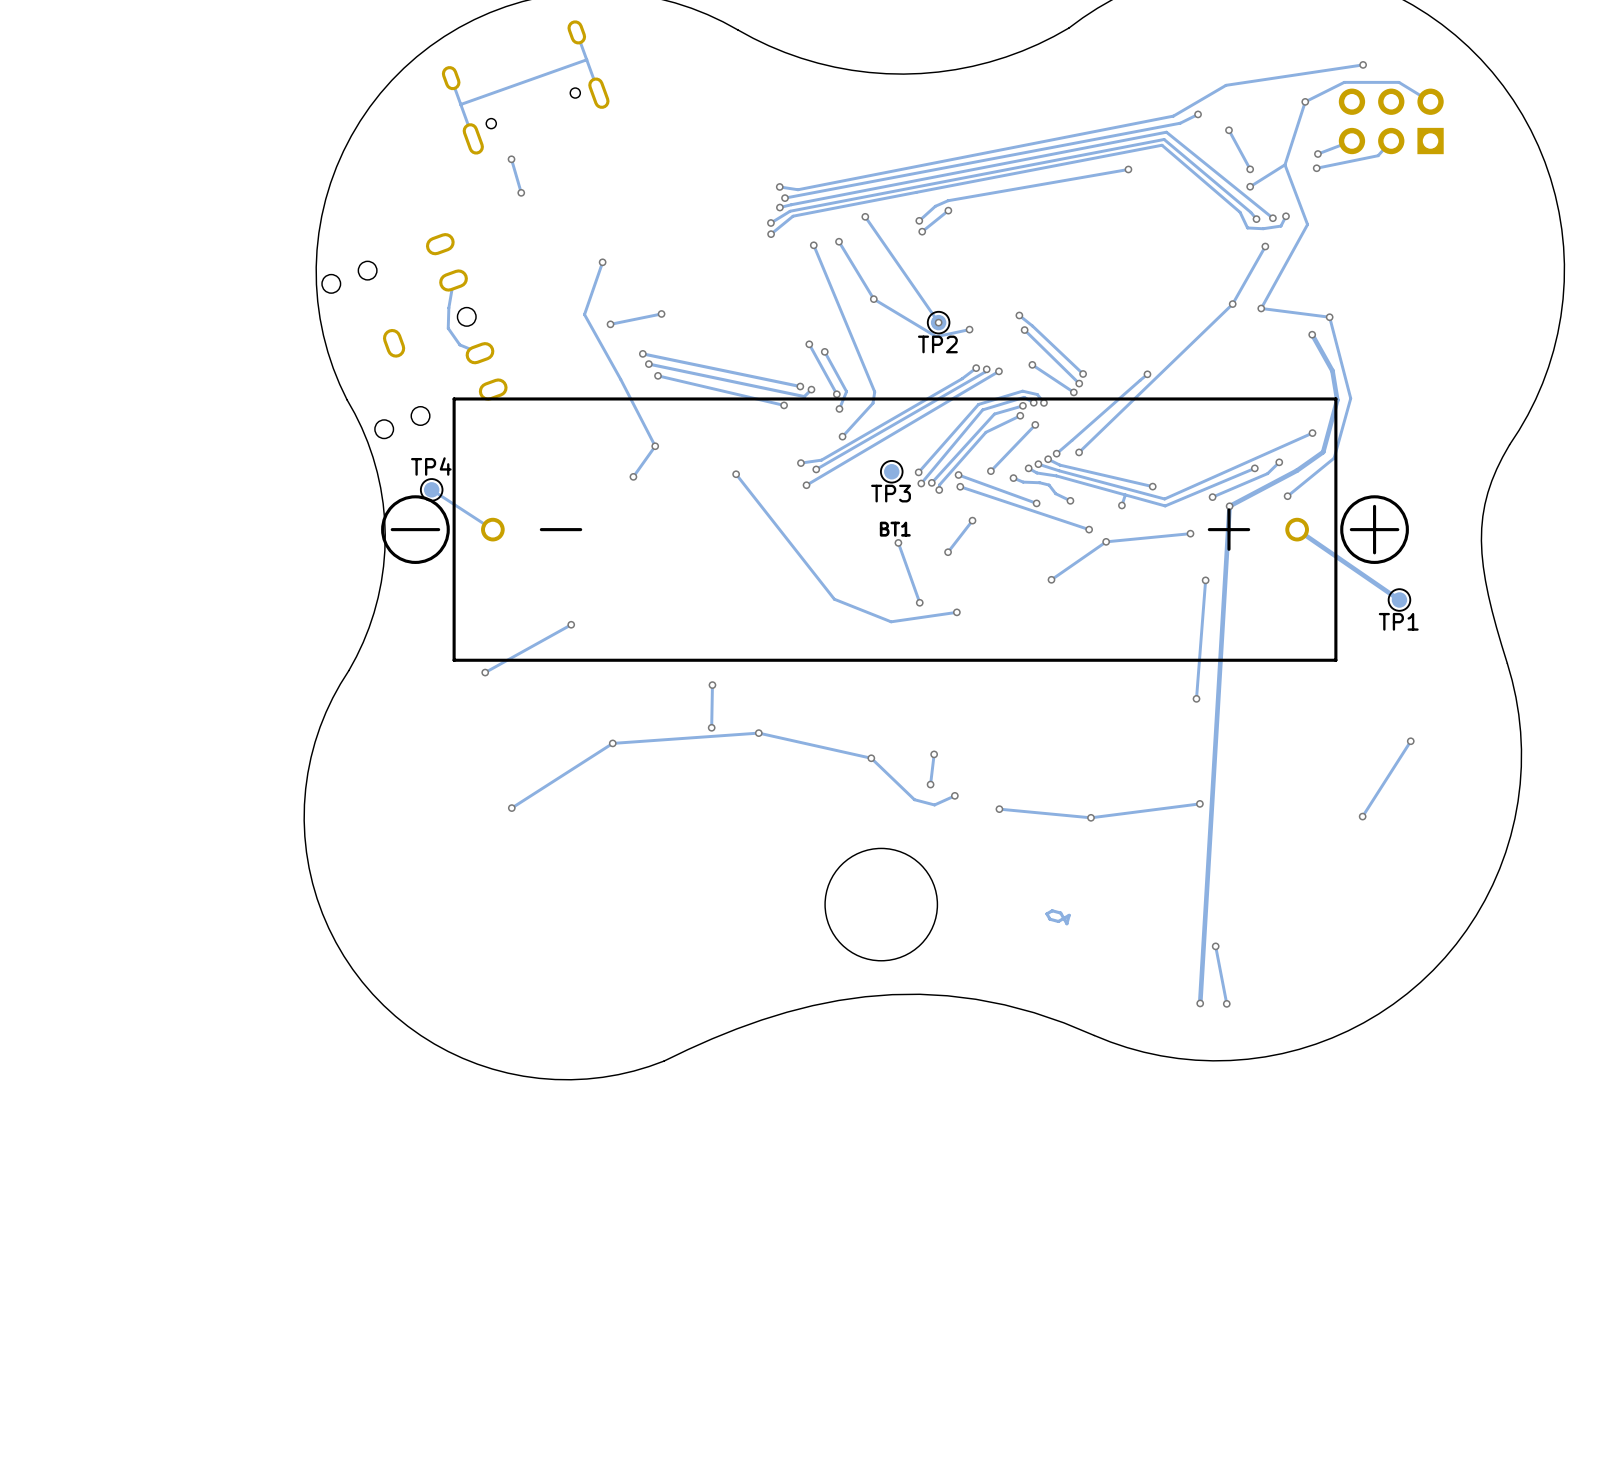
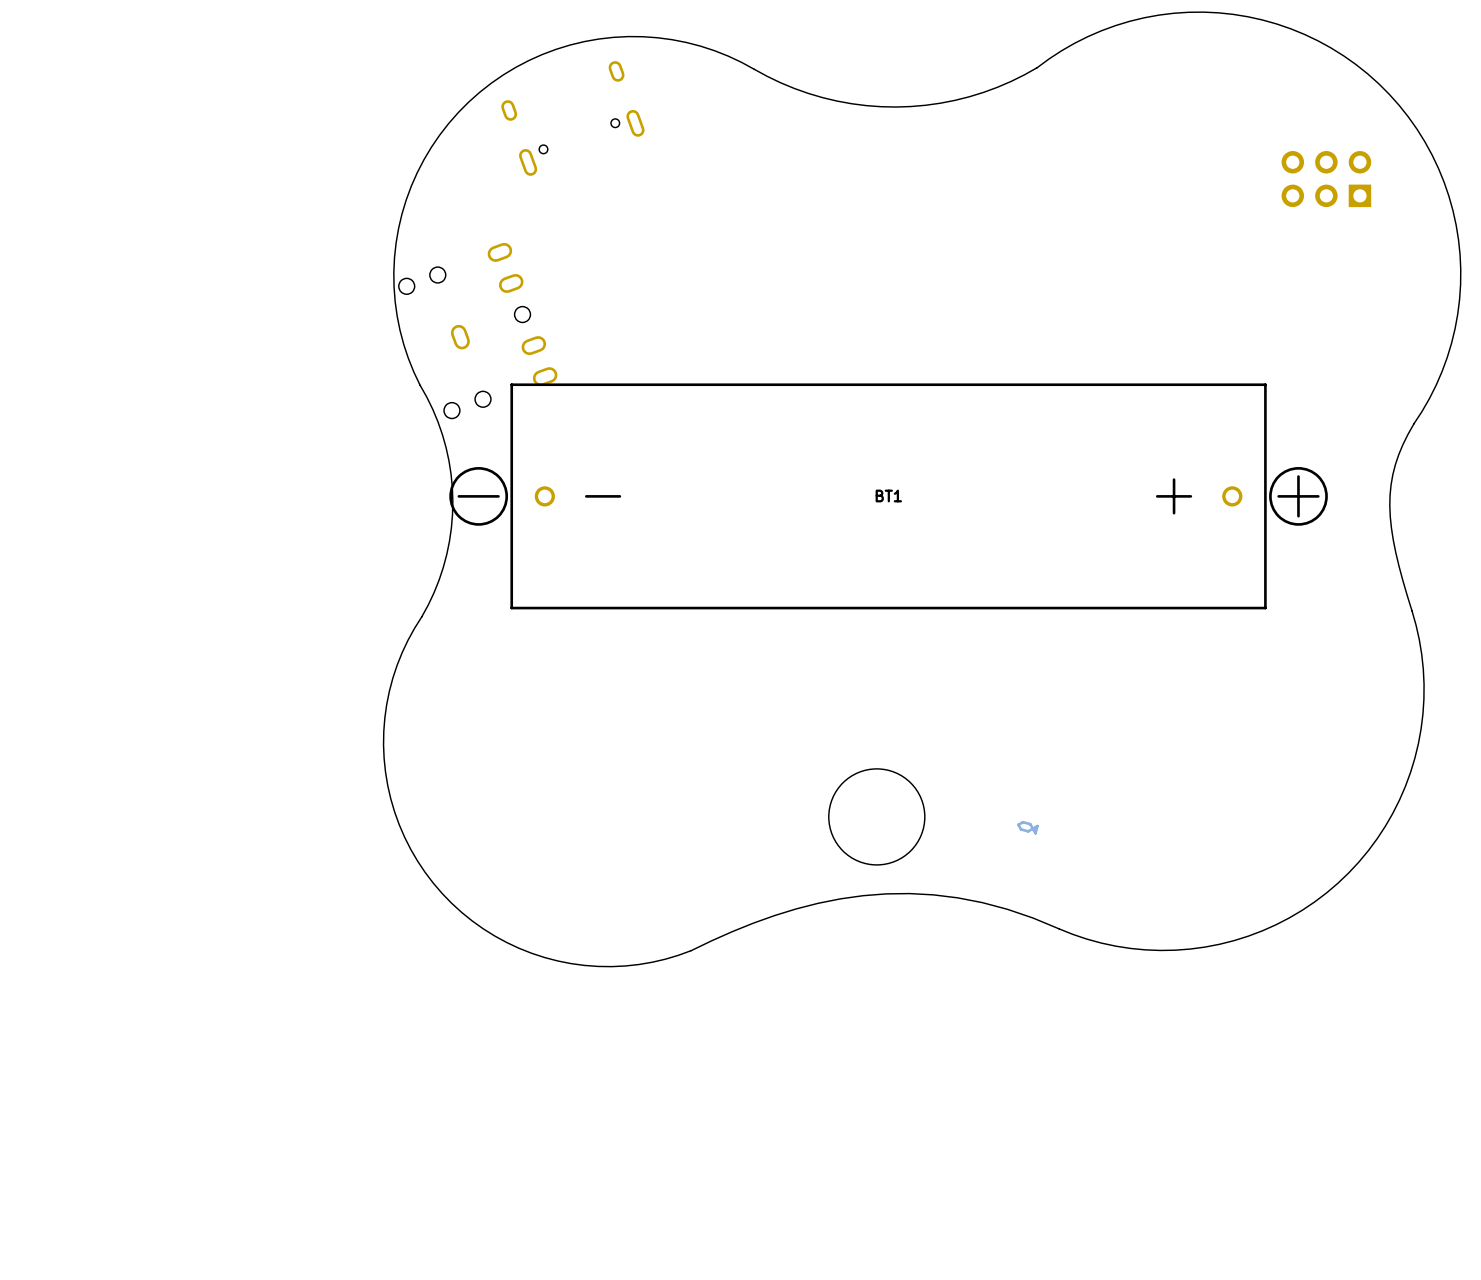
track: (576, 32) (598, 93) -> none
track: (586, 59) (460, 104) -> none
track: (1363, 64) (1226, 85) (1173, 116) (798, 189) (779, 186) -> none
via: (1363, 64) -> none
track: (451, 78) (473, 138) -> none
via: (1305, 101) -> none
track: (1430, 101) (1399, 82) (1344, 82) (1305, 101) (1284, 164) -> none
track: (1198, 114) (1180, 123) (785, 198) -> none
via: (1198, 114) -> none
part position: (1391, 121) -> (1326, 179)
track: (1228, 130) (1250, 169) -> none
via: (1228, 130) -> none
track: (1351, 141) (1317, 154) -> none
track: (1391, 141) (1378, 155) (1316, 168) -> none
via: (1317, 154) -> none
track: (511, 159) (521, 192) -> none
via: (511, 159) -> none
track: (1284, 164) (1307, 224) (1261, 308) (1329, 317) (1350, 398) (1334, 458) (1287, 496) -> none
track: (1284, 164) (1250, 186) -> none
via: (1316, 168) -> none
track: (1128, 169) (948, 200) (935, 206) (919, 220) -> none
via: (1128, 169) -> none
via: (1250, 169) -> none
via: (779, 186) -> none
via: (1250, 186) -> none
via: (521, 192) -> none
via: (785, 198) -> none
track: (779, 207) (1166, 132) (1272, 218) -> none
via: (779, 207) -> none
track: (948, 210) (922, 231) -> none
via: (948, 210) -> none
track: (865, 216) (938, 322) -> none
via: (865, 216) -> none
track: (1285, 216) (1280, 226) (1263, 228) (1247, 227) (1240, 212) (1162, 145) (793, 216) (771, 234) -> none
via: (1285, 216) -> none
via: (1272, 218) -> none
track: (1256, 219) (1164, 139) (790, 211) (770, 223) -> none
via: (1256, 219) -> none
via: (919, 220) -> none
via: (770, 223) -> none
via: (922, 231) -> none
via: (771, 234) -> none
track: (839, 241) (873, 299) (936, 336) (969, 329) -> none
via: (839, 241) -> none
track: (813, 245) (874, 391) (873, 403) (842, 436) -> none
via: (813, 245) -> none
track: (1265, 246) (1232, 304) (1079, 452) -> none
via: (1265, 246) -> none
track: (602, 262) (584, 314) (655, 446) (633, 476) -> none
via: (602, 262) -> none
track: (453, 280) (448, 307) (448, 328) (459, 344) (479, 353) -> none
via: (873, 299) -> none
via: (1232, 304) -> none
via: (1261, 308) -> none
track: (661, 313) (610, 324) -> none
via: (661, 313) -> none
track: (1019, 315) (1083, 373) -> none
via: (1019, 315) -> none
via: (1329, 317) -> none
TP2: (938, 322) -> none
via: (938, 322) -> none
via: (610, 324) -> none
via: (969, 329) -> none
track: (1024, 330) (1079, 383) -> none
via: (1024, 330) -> none
track: (1312, 334) (1332, 370) (1337, 400) (1323, 452) (1296, 470) (1229, 506) (1200, 1003) -> none
via: (1312, 334) -> none
track: (809, 344) (836, 394) -> none
via: (809, 344) -> none
track: (824, 351) (846, 391) (839, 408) -> none
via: (824, 351) -> none
track: (642, 353) (800, 386) -> none
via: (642, 353) -> none
track: (648, 364) (804, 396) (811, 389) -> none
via: (648, 364) -> none
track: (1032, 364) (1073, 392) -> none
via: (1032, 364) -> none
track: (976, 368) (962, 378) (821, 460) (800, 463) -> none
via: (976, 368) -> none
track: (986, 369) (816, 469) -> none
via: (986, 369) -> none
track: (998, 371) (806, 485) -> none
via: (998, 371) -> none
via: (1083, 373) -> none
track: (1147, 374) (1056, 453) -> none
via: (1147, 374) -> none
track: (658, 375) (784, 405) -> none
via: (658, 375) -> none
via: (1079, 383) -> none
via: (800, 386) -> none
via: (811, 389) -> none
via: (1073, 392) -> none
via: (836, 394) -> none
track: (1033, 402) (1024, 397) (982, 409) (921, 483) -> none
via: (1033, 402) -> none
track: (1043, 402) (1037, 394) (1022, 391) (978, 404) (918, 472) -> none
via: (1043, 402) -> none
via: (784, 405) -> none
track: (1022, 405) (994, 414) (931, 482) -> none
via: (1022, 405) -> none
via: (839, 408) -> none
track: (1020, 415) (985, 432) (939, 484) (939, 490) -> none
via: (1020, 415) -> none
track: (1035, 424) (990, 471) -> none
via: (1035, 424) -> none
track: (1312, 433) (1164, 498) (1038, 464) -> none
via: (1312, 433) -> none
via: (842, 436) -> none
via: (655, 446) -> none
via: (1079, 452) -> none
via: (1056, 453) -> none
track: (1048, 459) (1059, 465) (1152, 486) -> none
via: (1048, 459) -> none
track: (1279, 462) (1267, 473) (1212, 497) -> none
via: (1279, 462) -> none
via: (800, 463) -> none
via: (1038, 464) -> none
via: (1028, 468) -> none
track: (1254, 468) (1165, 505) (1056, 475) (1037, 472) (1028, 468) -> none
via: (1254, 468) -> none
via: (816, 469) -> none
TP3: (891, 471) -> none
via: (990, 471) -> none
via: (918, 472) -> none
track: (736, 474) (834, 599) (891, 621) (956, 612) -> none
via: (736, 474) -> none
track: (958, 475) (1036, 503) -> none
via: (958, 475) -> none
via: (633, 476) -> none
track: (1013, 478) (1023, 482) (1049, 485) (1055, 493) (1070, 500) -> none
via: (1013, 478) -> none
via: (931, 482) -> none
via: (921, 483) -> none
via: (806, 485) -> none
track: (960, 486) (1089, 529) -> none
via: (960, 486) -> none
via: (1152, 486) -> none
track: (431, 489) (492, 529) -> none
TP4: (431, 489) -> none
via: (939, 490) -> none
track: (1125, 494) (1121, 505) -> none
via: (1287, 496) -> none
via: (1212, 497) -> none
via: (1070, 500) -> none
via: (1036, 503) -> none
via: (1121, 505) -> none
via: (1229, 506) -> none
track: (972, 520) (948, 552) -> none
via: (972, 520) -> none
via: (1089, 529) -> none
track: (1297, 529) (1399, 600) -> none
track: (1190, 533) (1106, 541) (1051, 579) -> none
via: (1190, 533) -> none
via: (1106, 541) -> none
track: (898, 542) (919, 602) -> none
via: (898, 542) -> none
via: (948, 552) -> none
via: (1051, 579) -> none
track: (1205, 580) (1196, 698) -> none
via: (1205, 580) -> none
TP1: (1399, 600) -> none
via: (919, 602) -> none
via: (956, 612) -> none
track: (571, 624) (485, 672) -> none
via: (571, 624) -> none
via: (485, 672) -> none
track: (712, 685) (711, 727) -> none
via: (712, 685) -> none
via: (1196, 698) -> none
via: (711, 727) -> none
via: (758, 733) -> none
track: (1410, 741) (1362, 816) -> none
via: (1410, 741) -> none
via: (612, 743) -> none
track: (934, 754) (930, 784) -> none
via: (934, 754) -> none
via: (871, 758) -> none
via: (930, 784) -> none
track: (954, 795) (934, 804) (914, 799) (871, 758) (758, 733) (612, 743) (511, 808) -> none
via: (954, 795) -> none
track: (1199, 803) (1091, 817) (999, 809) -> none
via: (1199, 803) -> none
via: (511, 808) -> none
via: (999, 809) -> none
via: (1362, 816) -> none
via: (1091, 817) -> none
track: (1215, 946) (1226, 1003) -> none
via: (1215, 946) -> none
via: (1200, 1003) -> none
via: (1226, 1003) -> none

